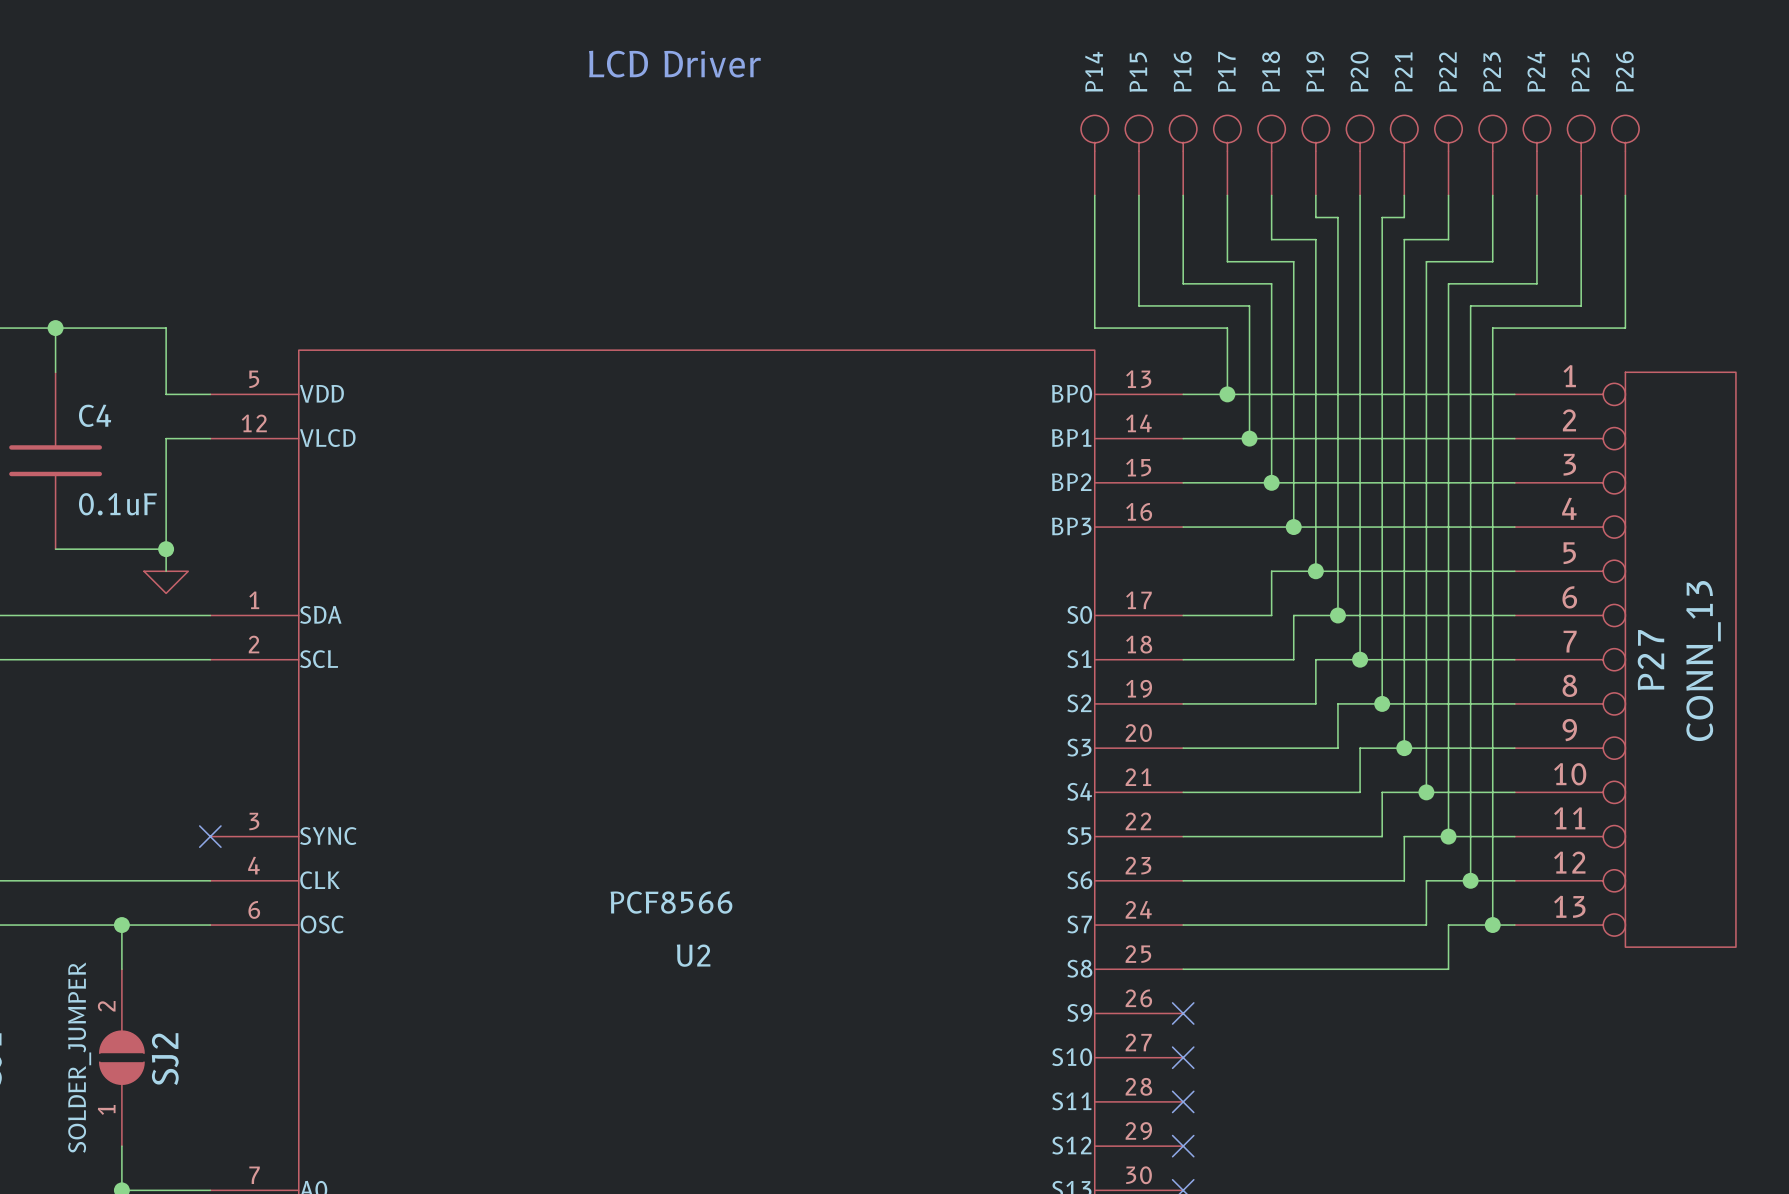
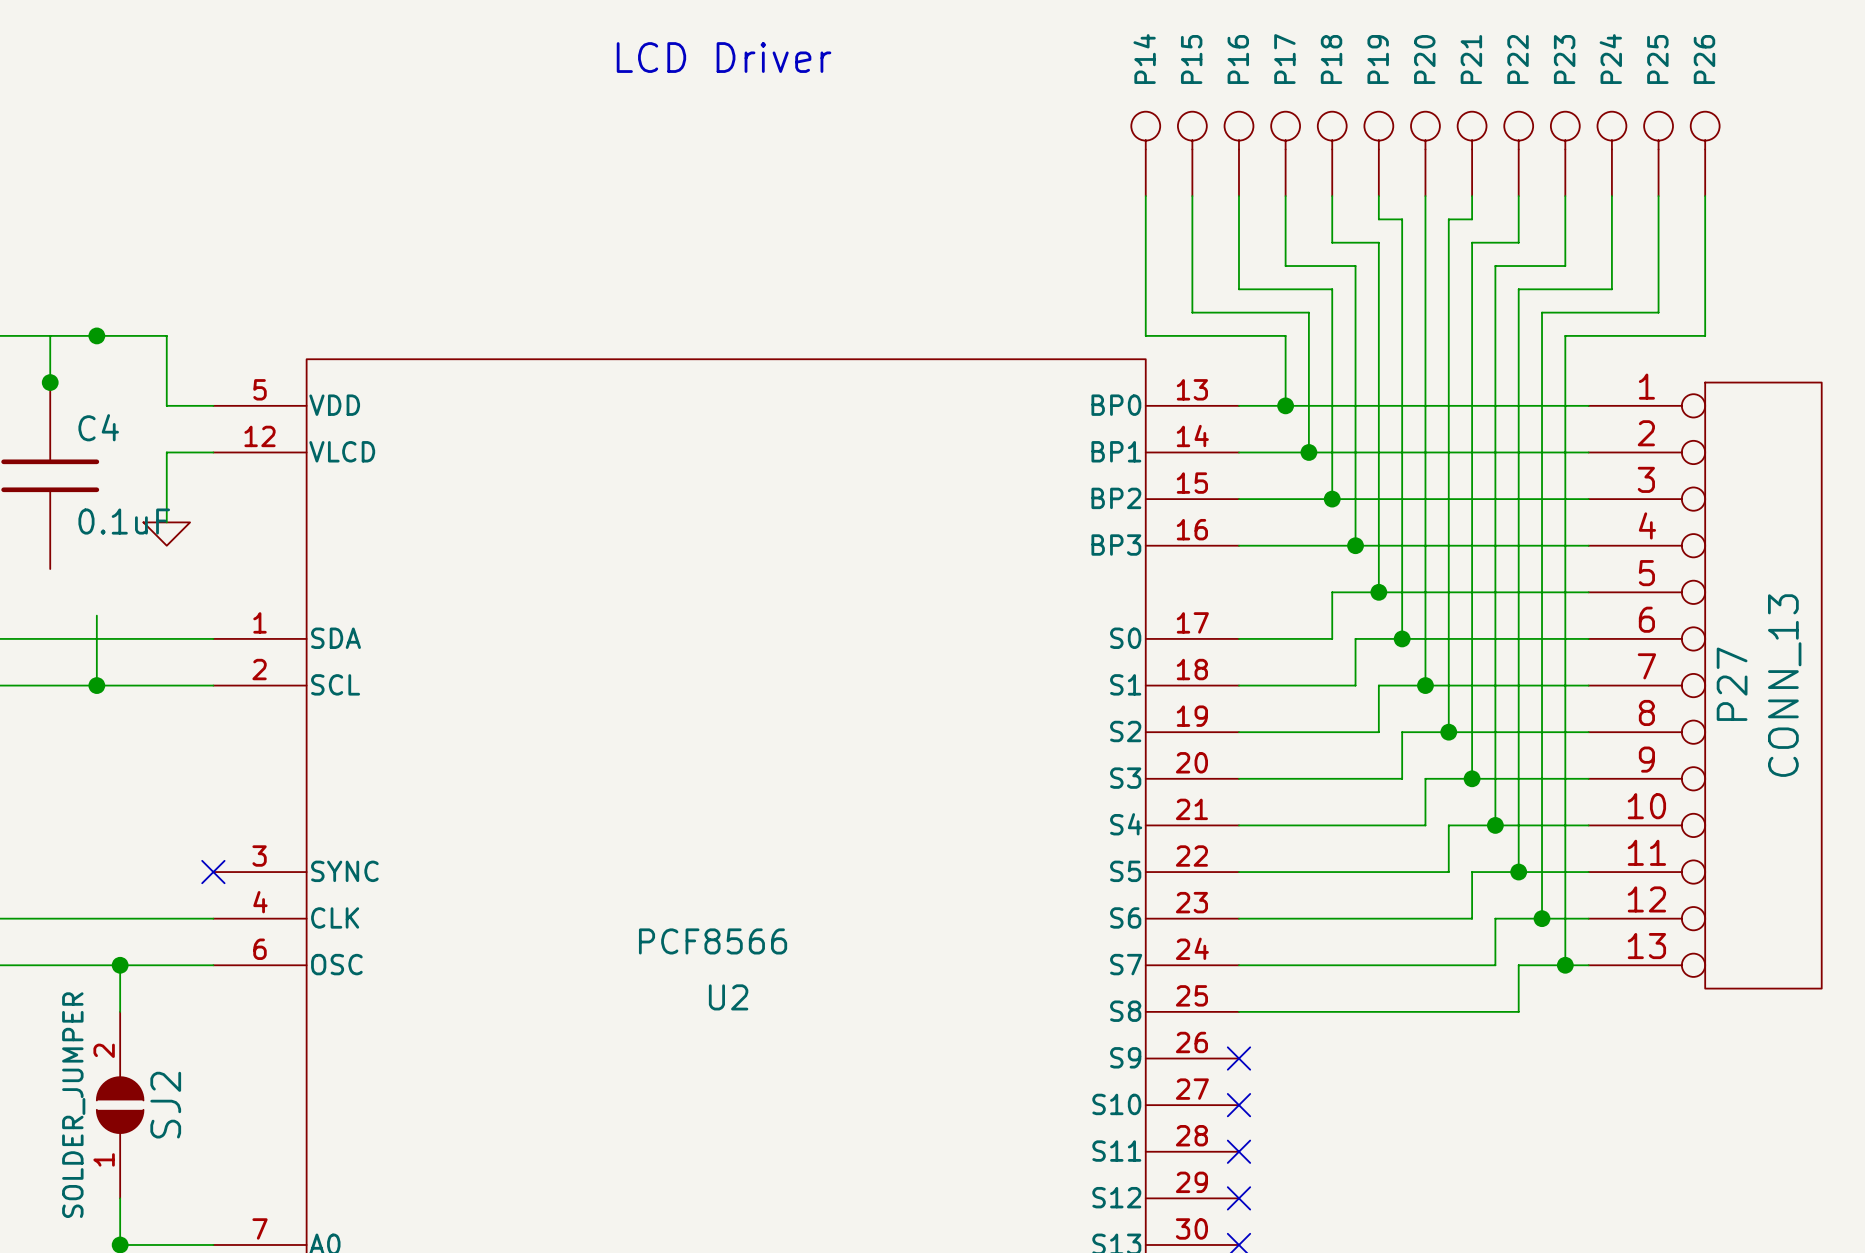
junction: (55, 328) -> none
junction: none -> (96, 335)
junction: none -> (50, 382)
wire: (166, 504) (166, 571) -> (96, 615) (96, 685)
wire: (55, 549) (166, 549) -> none
junction: (166, 549) -> none
power symbol position: (166, 582) -> (166, 534)
junction: none -> (96, 685)

